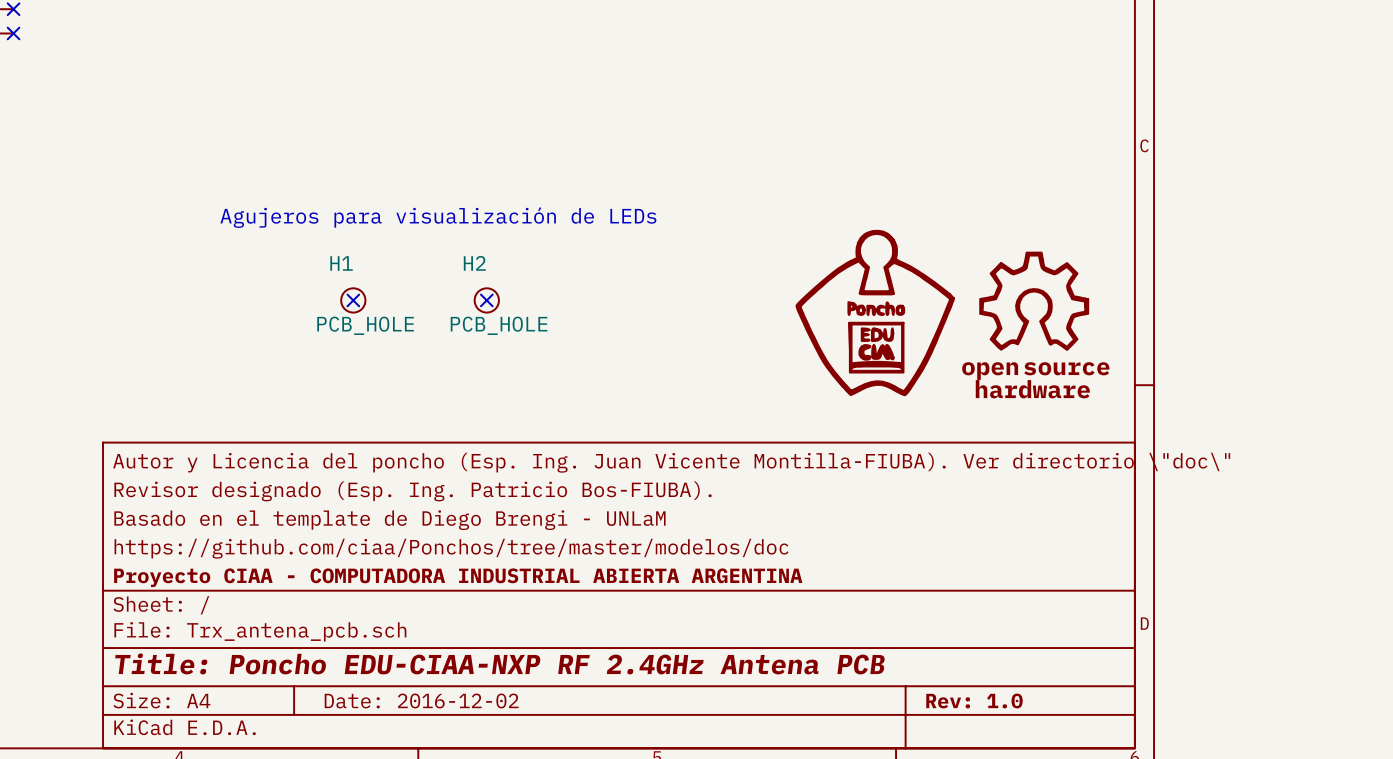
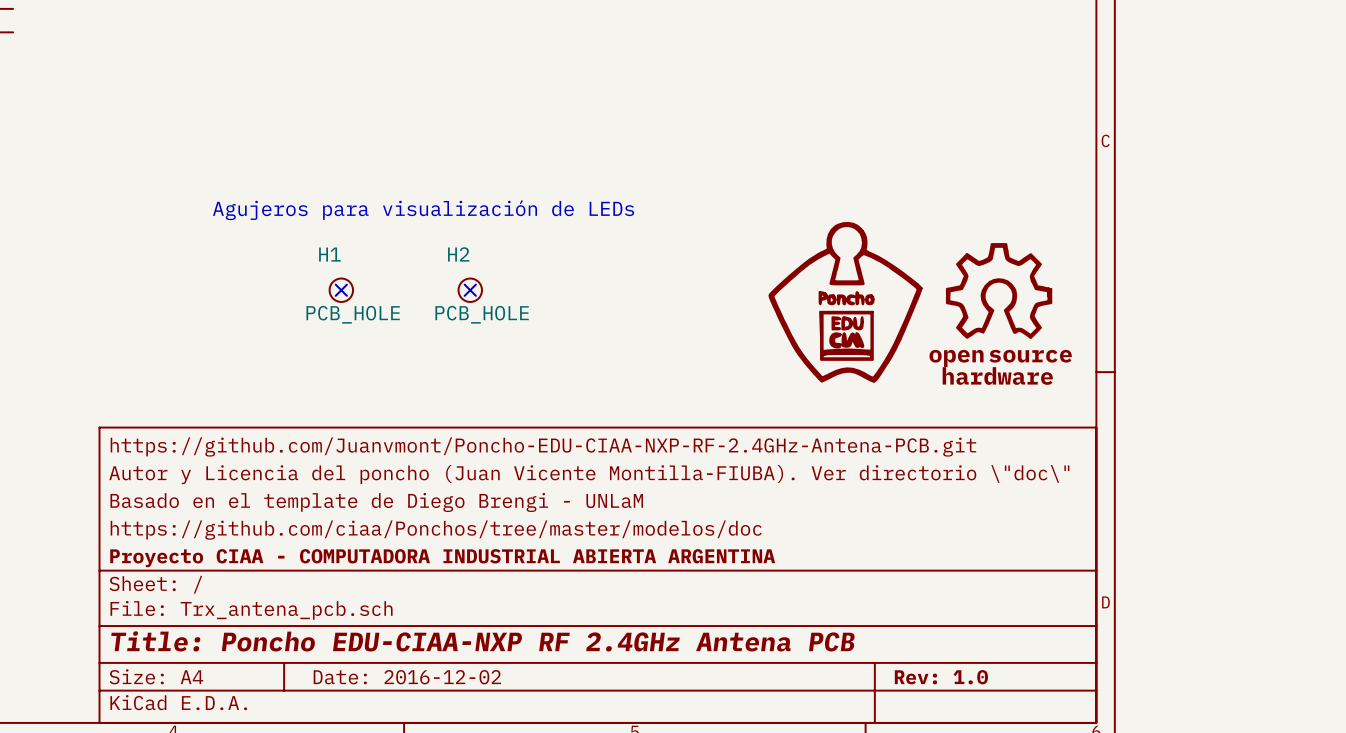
no-connect mark: (13, 9) -> none
no-connect mark: (13, 33) -> none
title block: Autor y Licencia del poncho (Esp. Ing. Juan Vicente Montilla-FIUBA). Ver directorio \"doc\" (671, 462) -> https://github.com/Juanvmont/Poncho-EDU-CIAA-NXP-RF-2.4GHz-Antena-PCB.git (543, 446)
title block: Revisor designado (Esp. Ing. Patricio Bos-FIUBA). (413, 491) -> Autor y Licencia del poncho (Juan Vicente Montilla-FIUBA). Ver directorio \"doc\" (589, 474)

